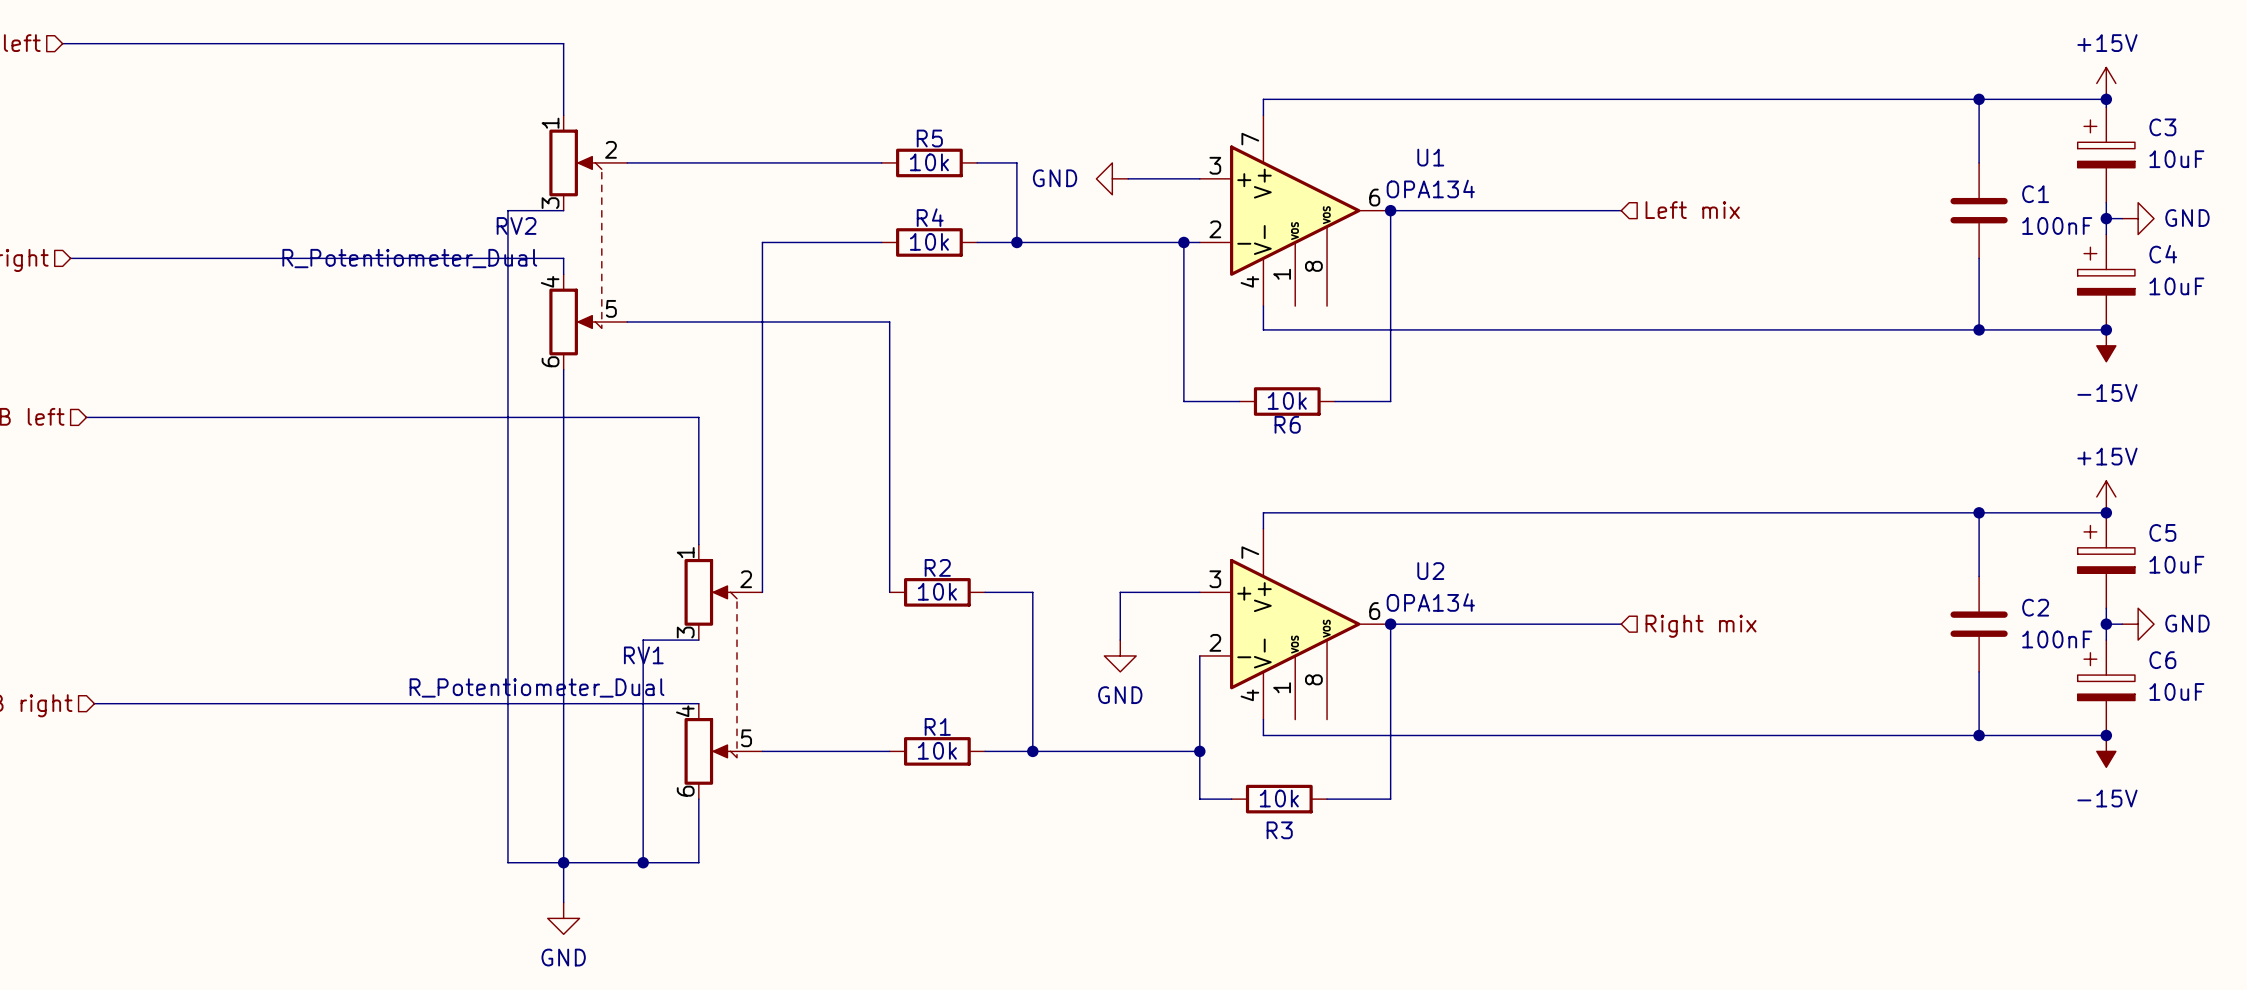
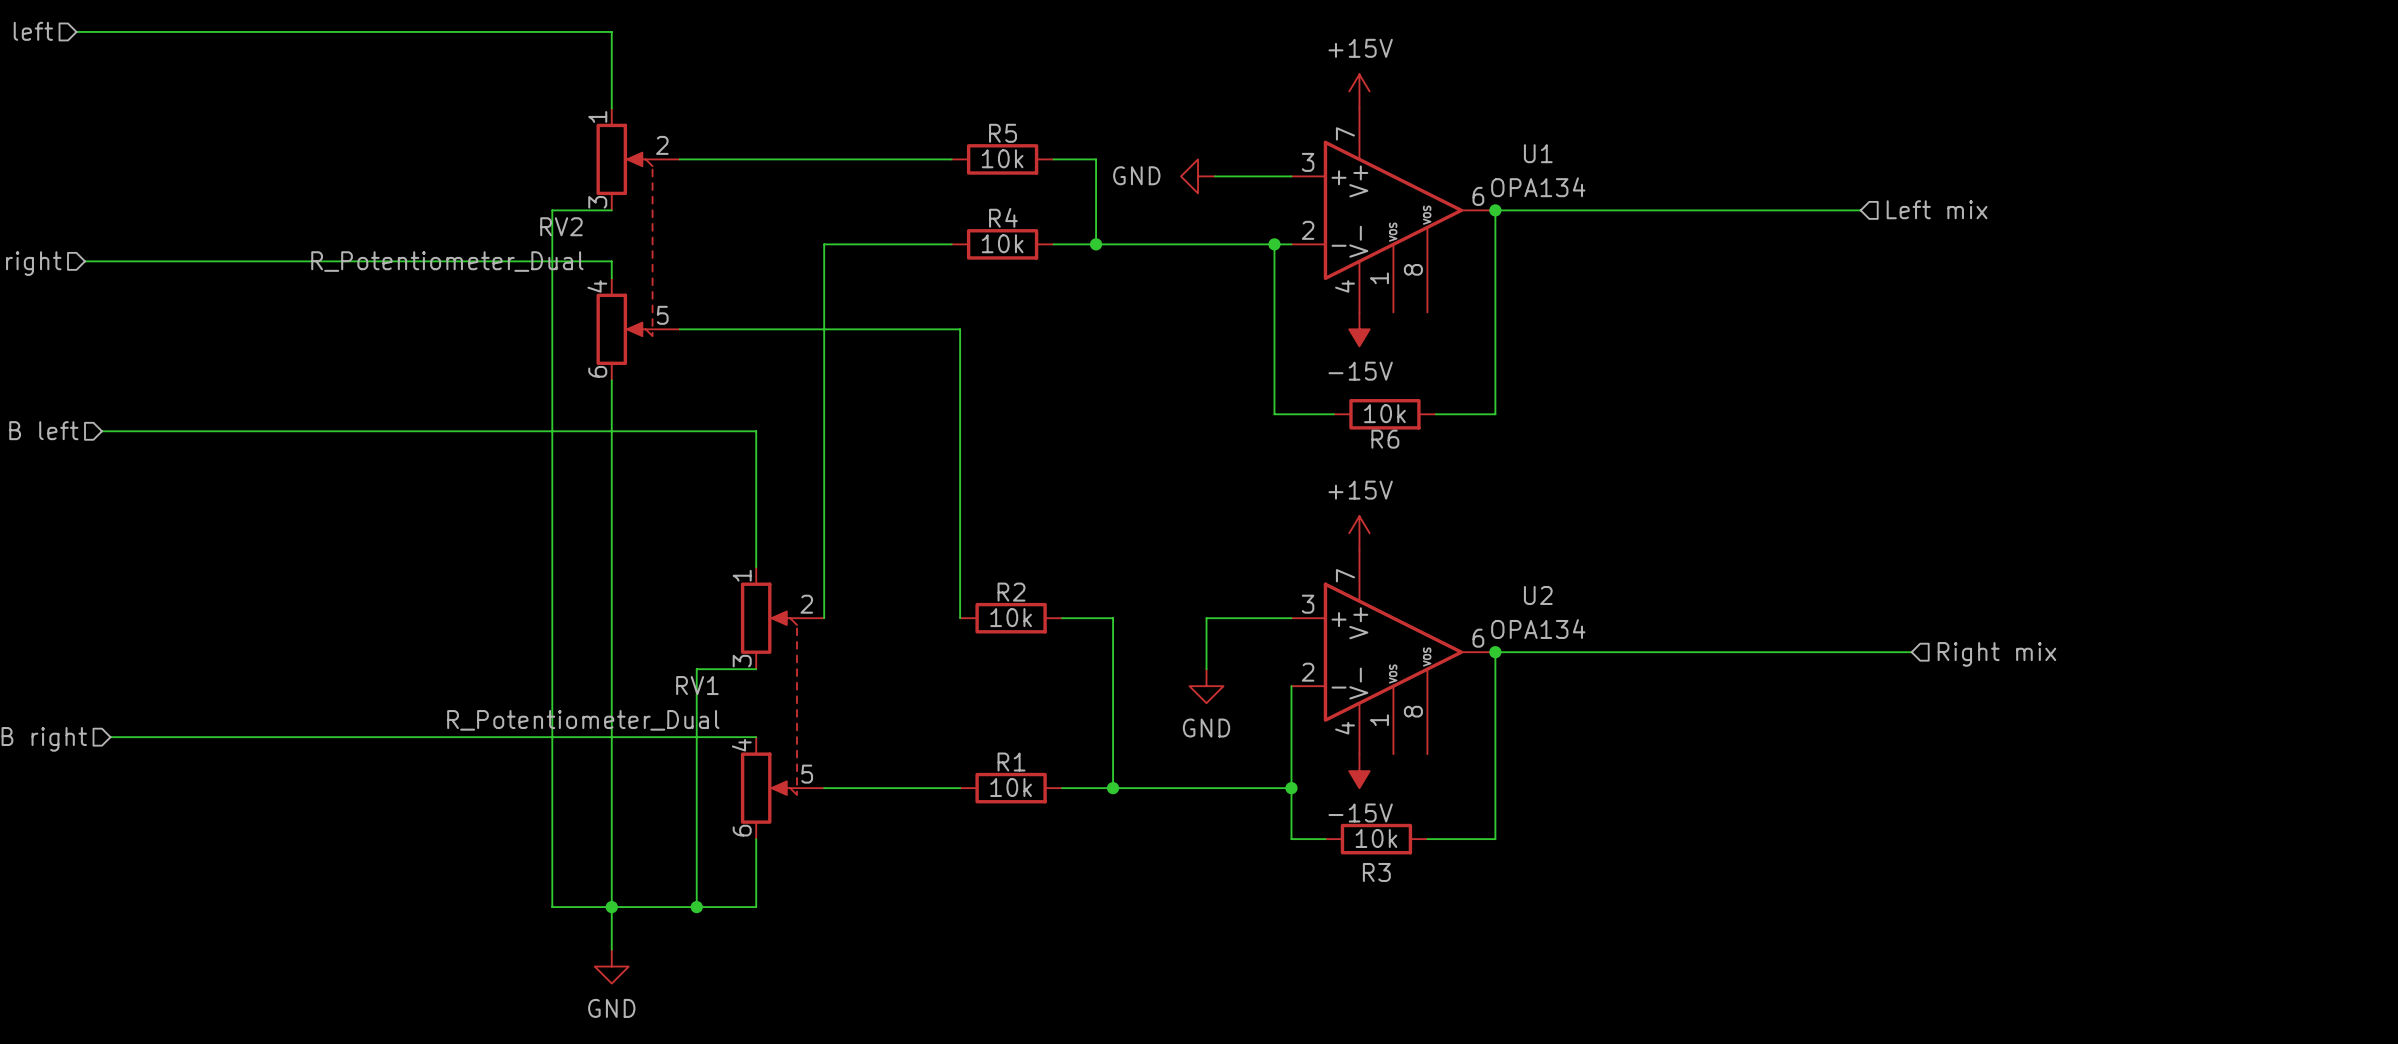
power symbol: +15V (2106, 83) -> none
power symbol: none -> +15V (1359, 91)
wire: (1979, 99) (1979, 162) -> none
junction: (1979, 99) -> none
junction: (2106, 99) -> none
wire: (2106, 107) (2106, 99) (1263, 99) (1263, 115) -> none
C3: 10uF (2106, 155) -> none
wire: (2106, 202) (2106, 234) -> none
wire: none -> (1741, 210) (1860, 210)
hierarchical label position: Left mix (1692, 210) -> Left mix (1937, 209)
C1: 100nF (1979, 210) -> none
wire: (2106, 218) (2122, 218) -> none
junction: (2106, 218) -> none
power symbol: GND (2138, 218) -> none
wire: (1979, 258) (1979, 329) -> none
C4: 10uF (2106, 282) -> none
wire: (1263, 306) (1263, 329) (2106, 329) -> none
power symbol: none -> -15V (1359, 329)
junction: (1979, 329) -> none
junction: (2106, 329) -> none
power symbol: -15V (2106, 345) -> none
power symbol: +15V (2106, 496) -> none
power symbol: none -> +15V (1359, 533)
wire: (1979, 512) (1979, 576) -> none
junction: (1979, 512) -> none
wire: (2106, 512) (1263, 512) (1263, 528) -> none
junction: (2106, 512) -> none
C5: 10uF (2106, 560) -> none
wire: (2106, 608) (2106, 640) -> none
wire: none -> (1741, 652) (1911, 652)
C2: 100nF (1979, 624) -> none
wire: (2106, 624) (2122, 624) -> none
junction: (2106, 624) -> none
power symbol: GND (2138, 624) -> none
hierarchical label position: Right mix (1701, 626) -> Right mix (1996, 654)
wire: (1979, 671) (1979, 735) -> none
C6: 10uF (2106, 687) -> none
wire: (1263, 719) (1263, 735) (2106, 735) -> none
power symbol: none -> -15V (1359, 771)
junction: (1979, 735) -> none
junction: (2106, 735) -> none
power symbol: -15V (2106, 751) -> none

